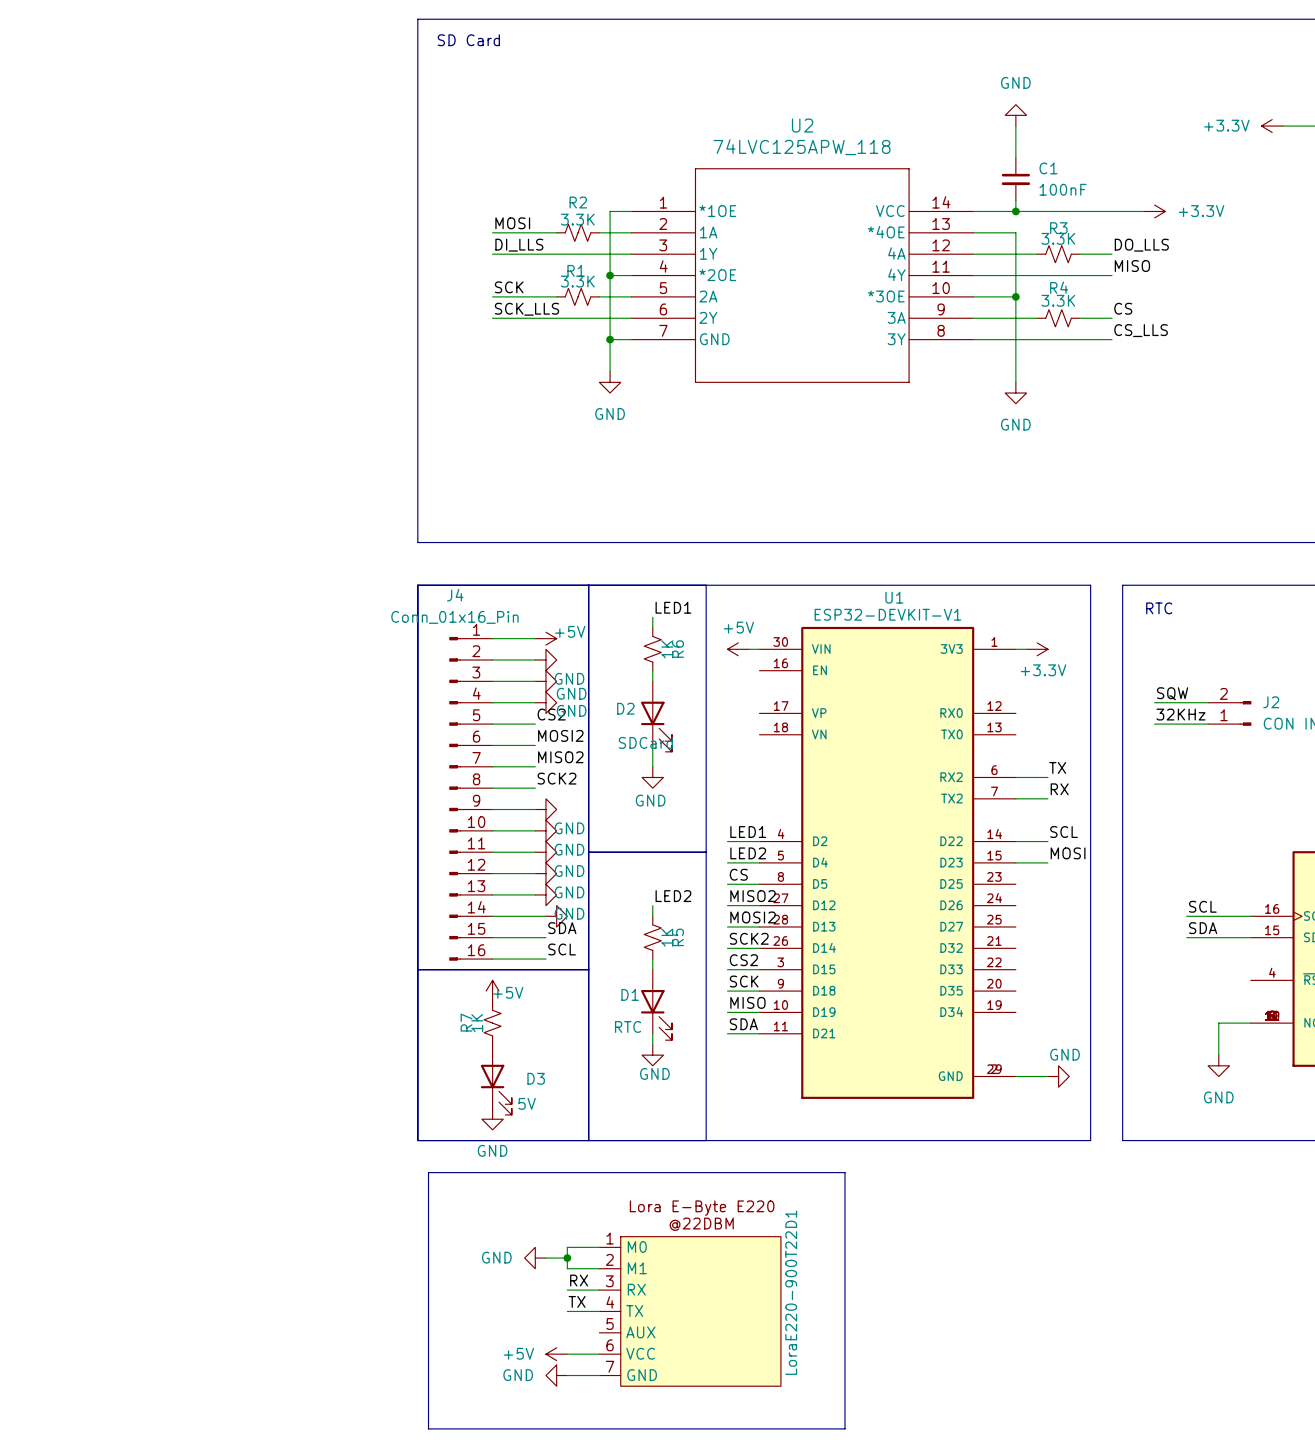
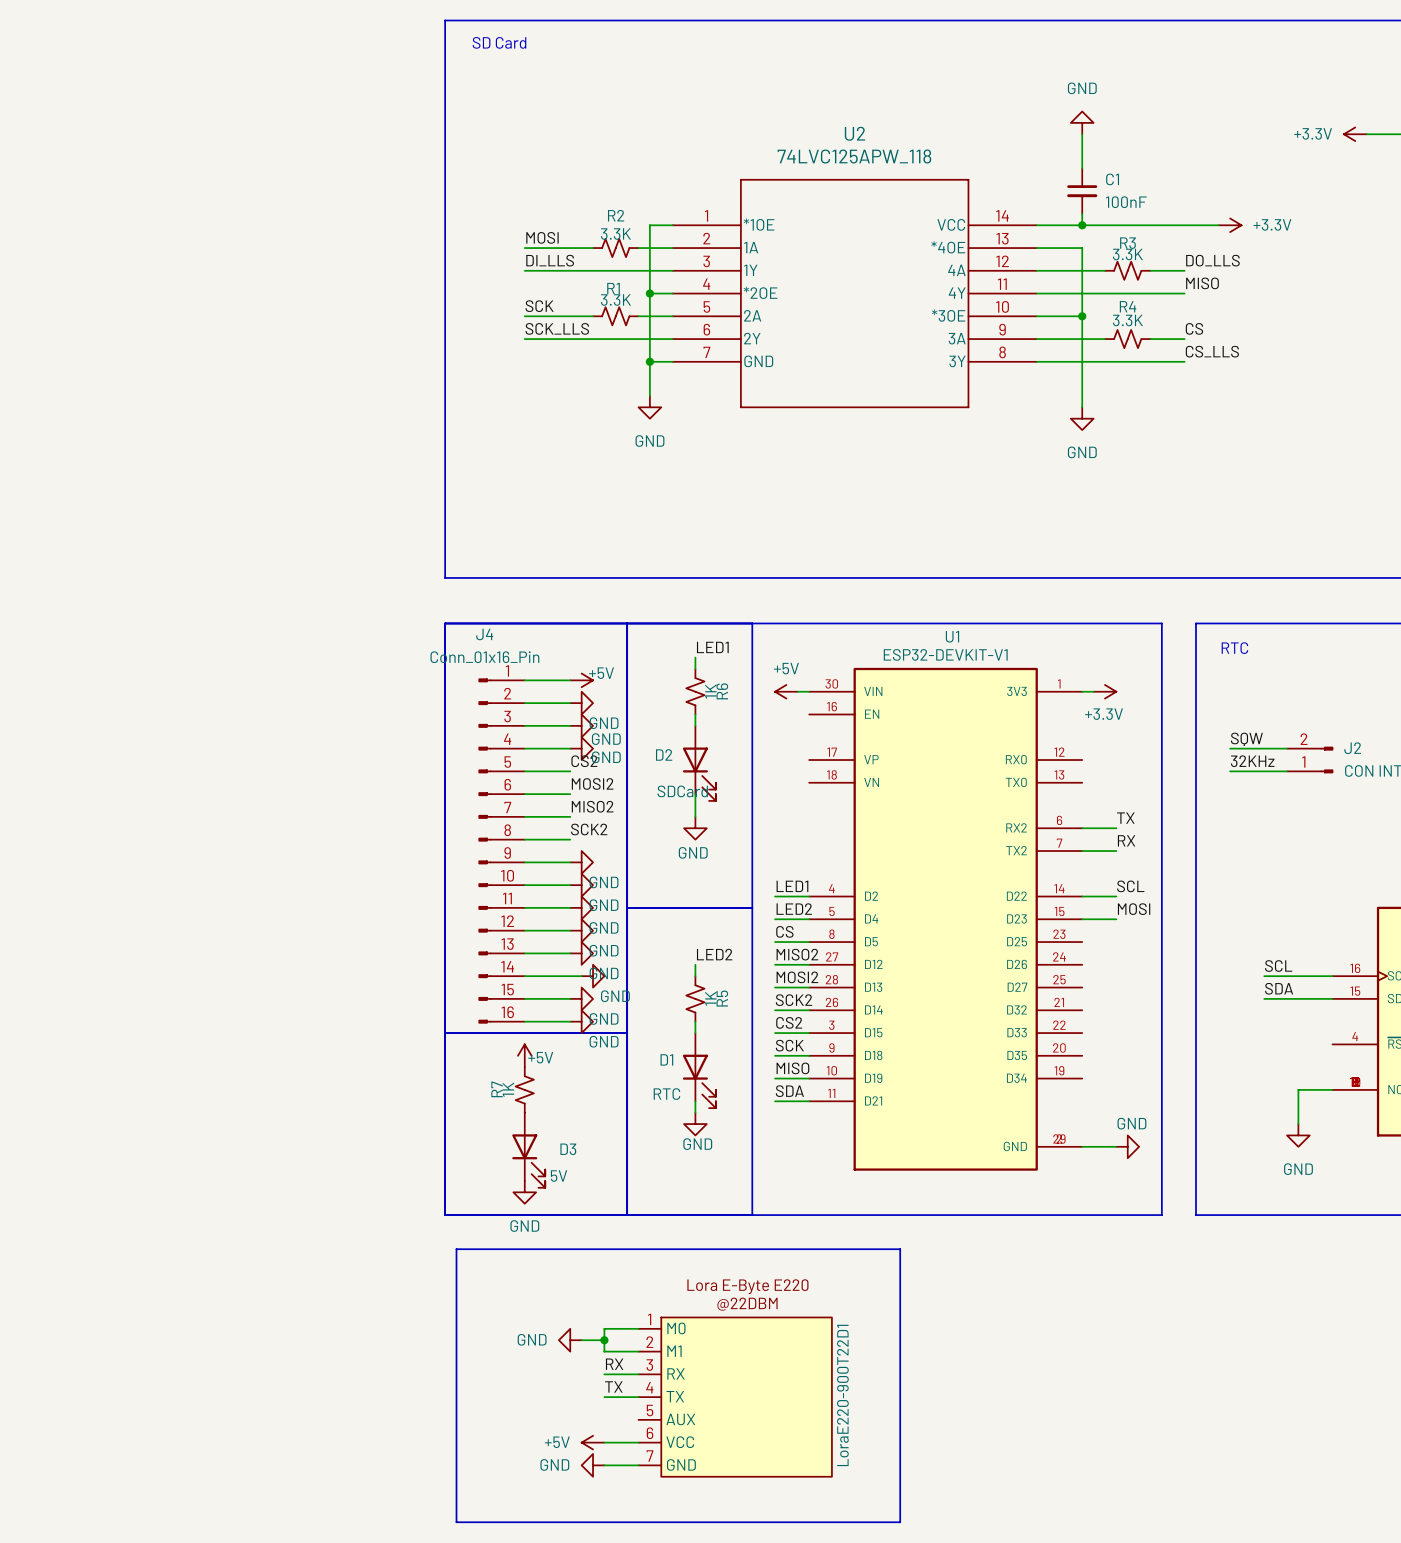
label: SDA (562, 928) -> none
power symbol text: none -> GND (615, 996)
power symbol: none -> GND (581, 998)
label: SCL (562, 949) -> none
power symbol: none -> GND (581, 1021)

